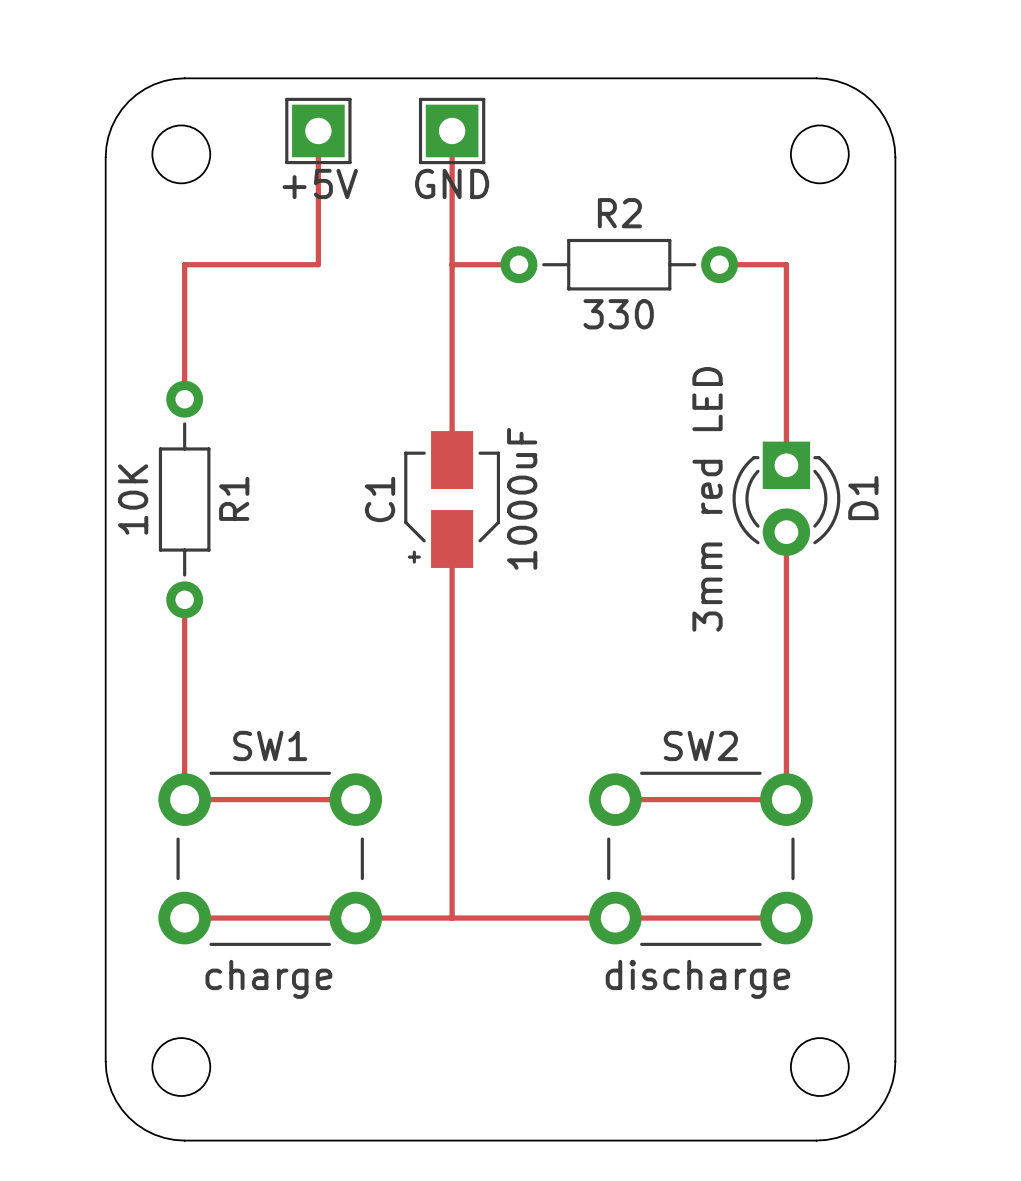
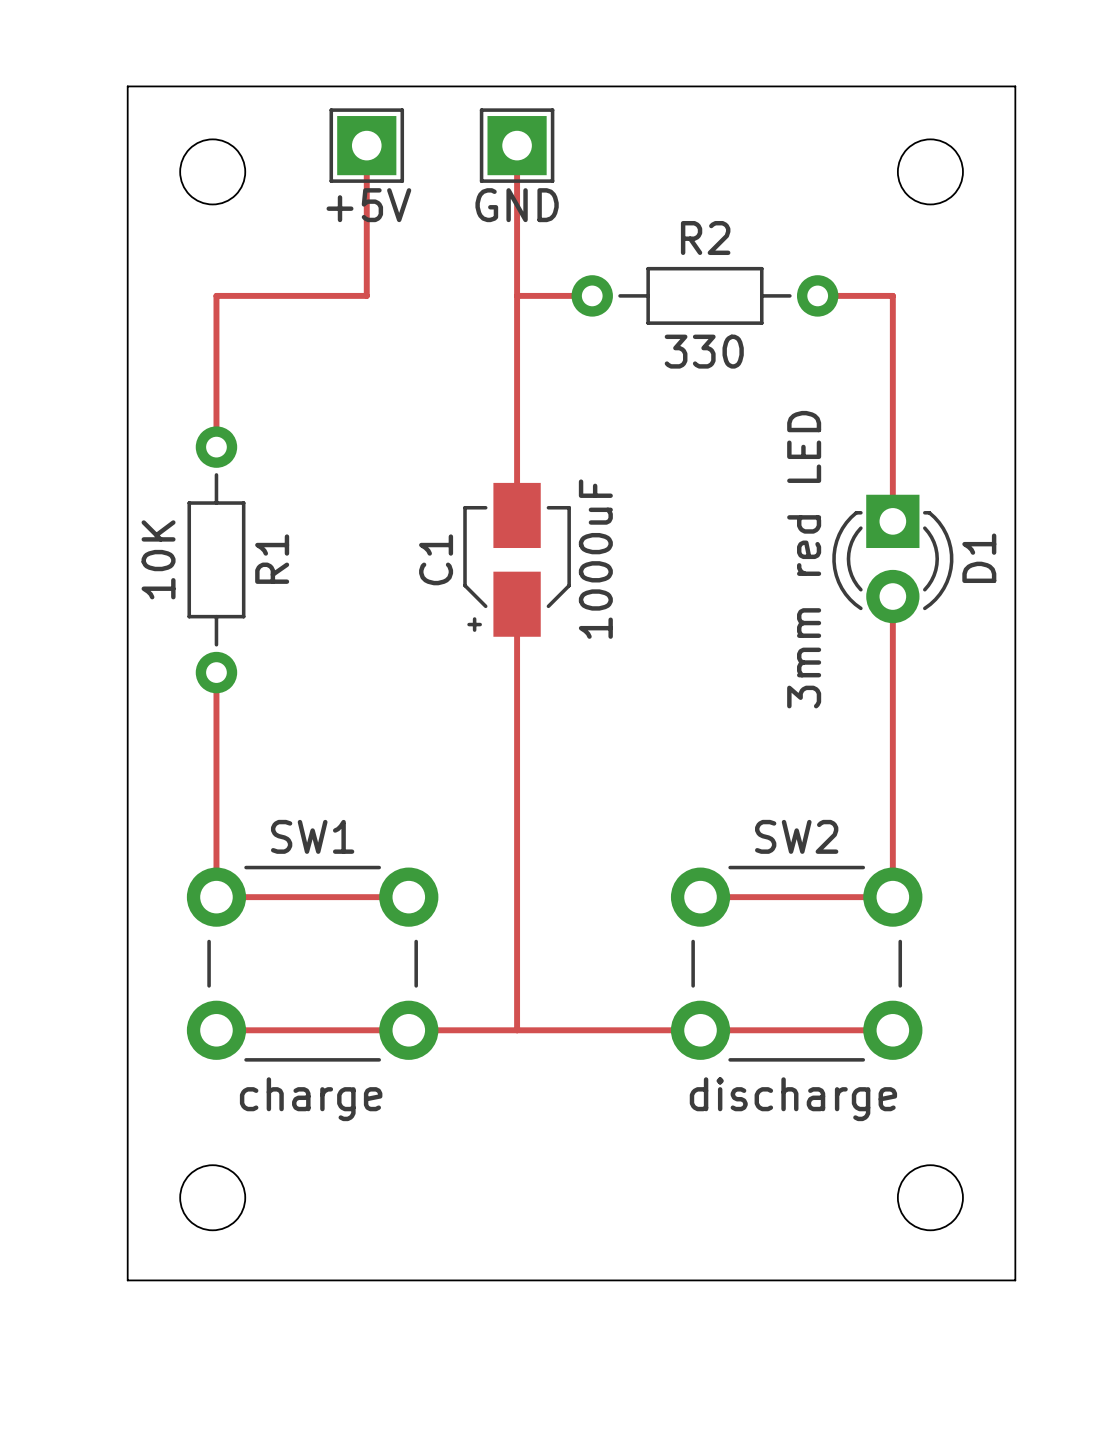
board edge: (184, 78) (154, 84) (128, 101) (111, 127) (105, 157) -> (216, 86) (127, 86) (127, 175)
board edge: (816, 78) (846, 84) (872, 101) (889, 127) (895, 157) -> (926, 86) (1015, 86) (1015, 175)
board edge: (105, 1061) (111, 1091) (128, 1117) (154, 1134) (184, 1140) -> (127, 1191) (127, 1280) (216, 1280)
board edge: (895, 1061) (889, 1091) (872, 1117) (846, 1134) (816, 1140) -> (1015, 1191) (1015, 1280) (926, 1280)

